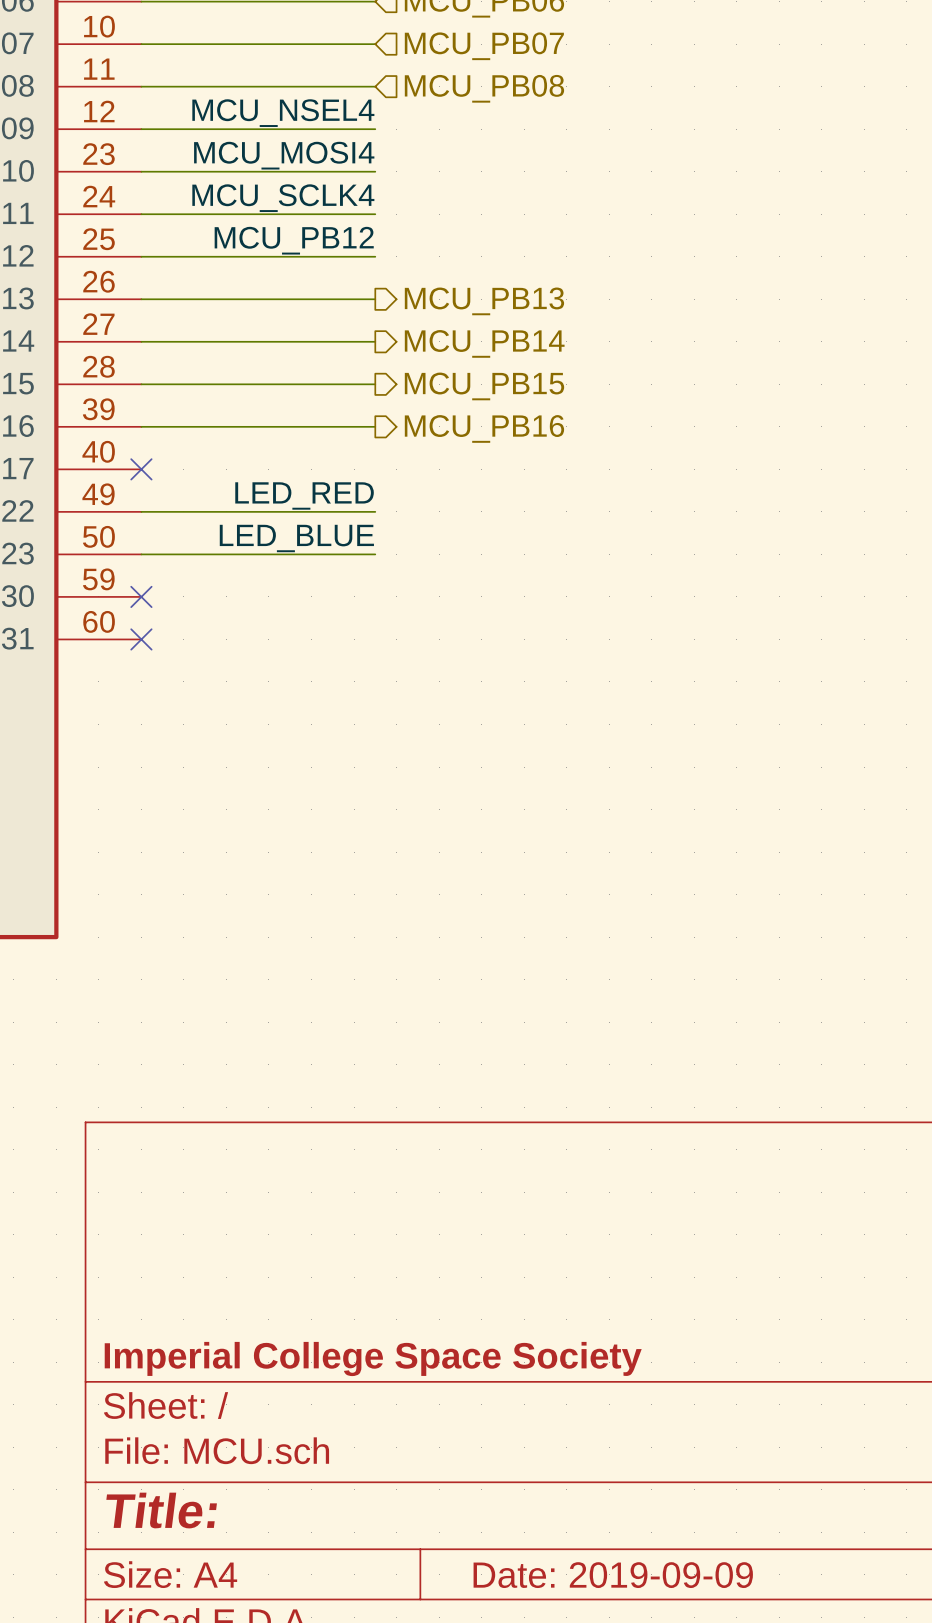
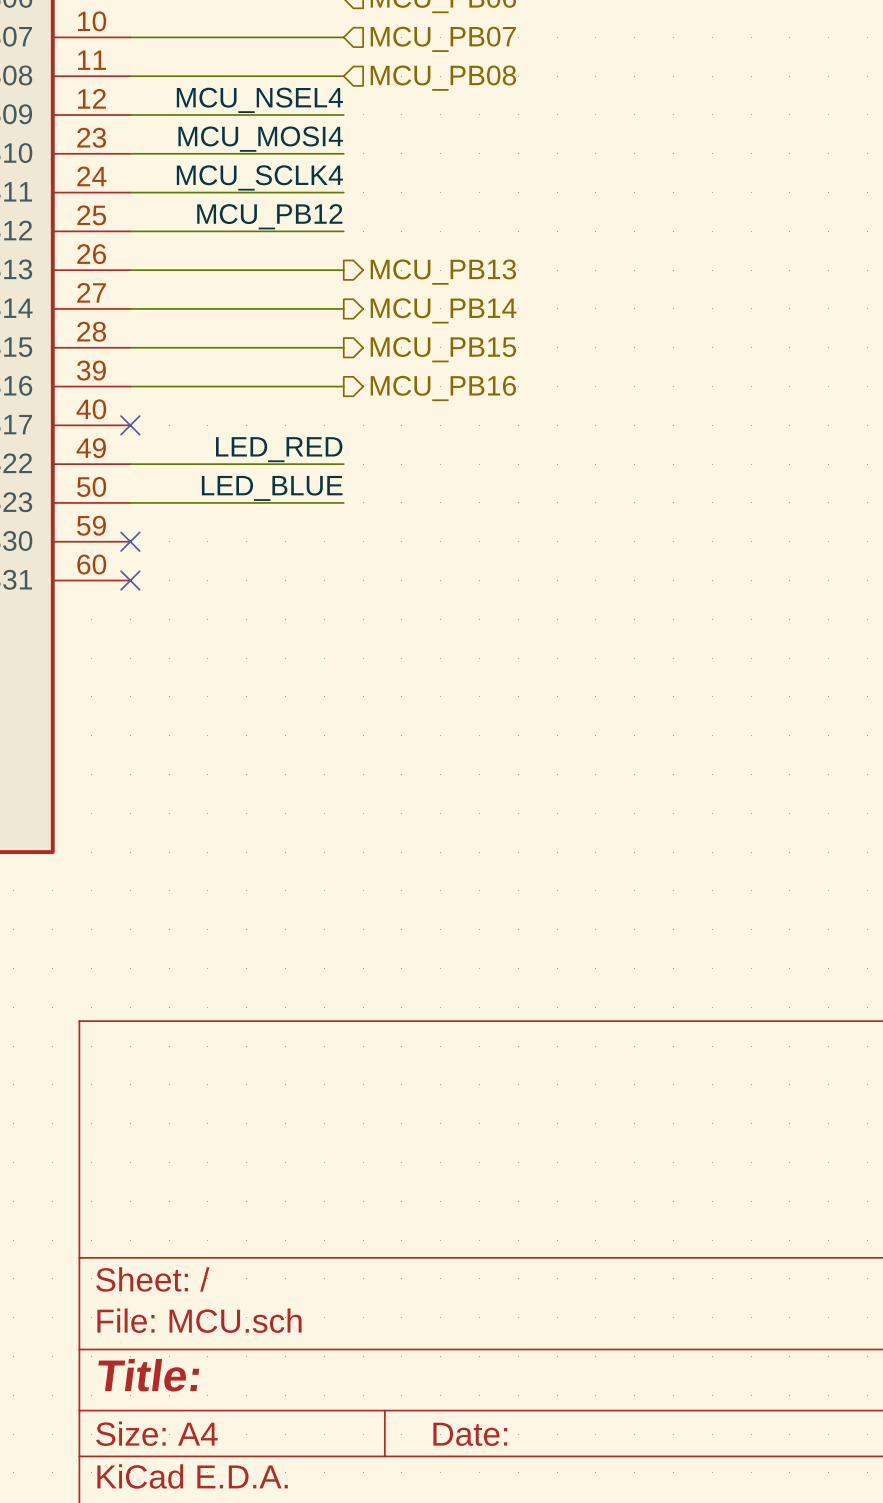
title block: Imperial College Space Society (373, 1359) -> none
title block: Date: 2019-09-09 (613, 1575) -> Date: (470, 1434)

